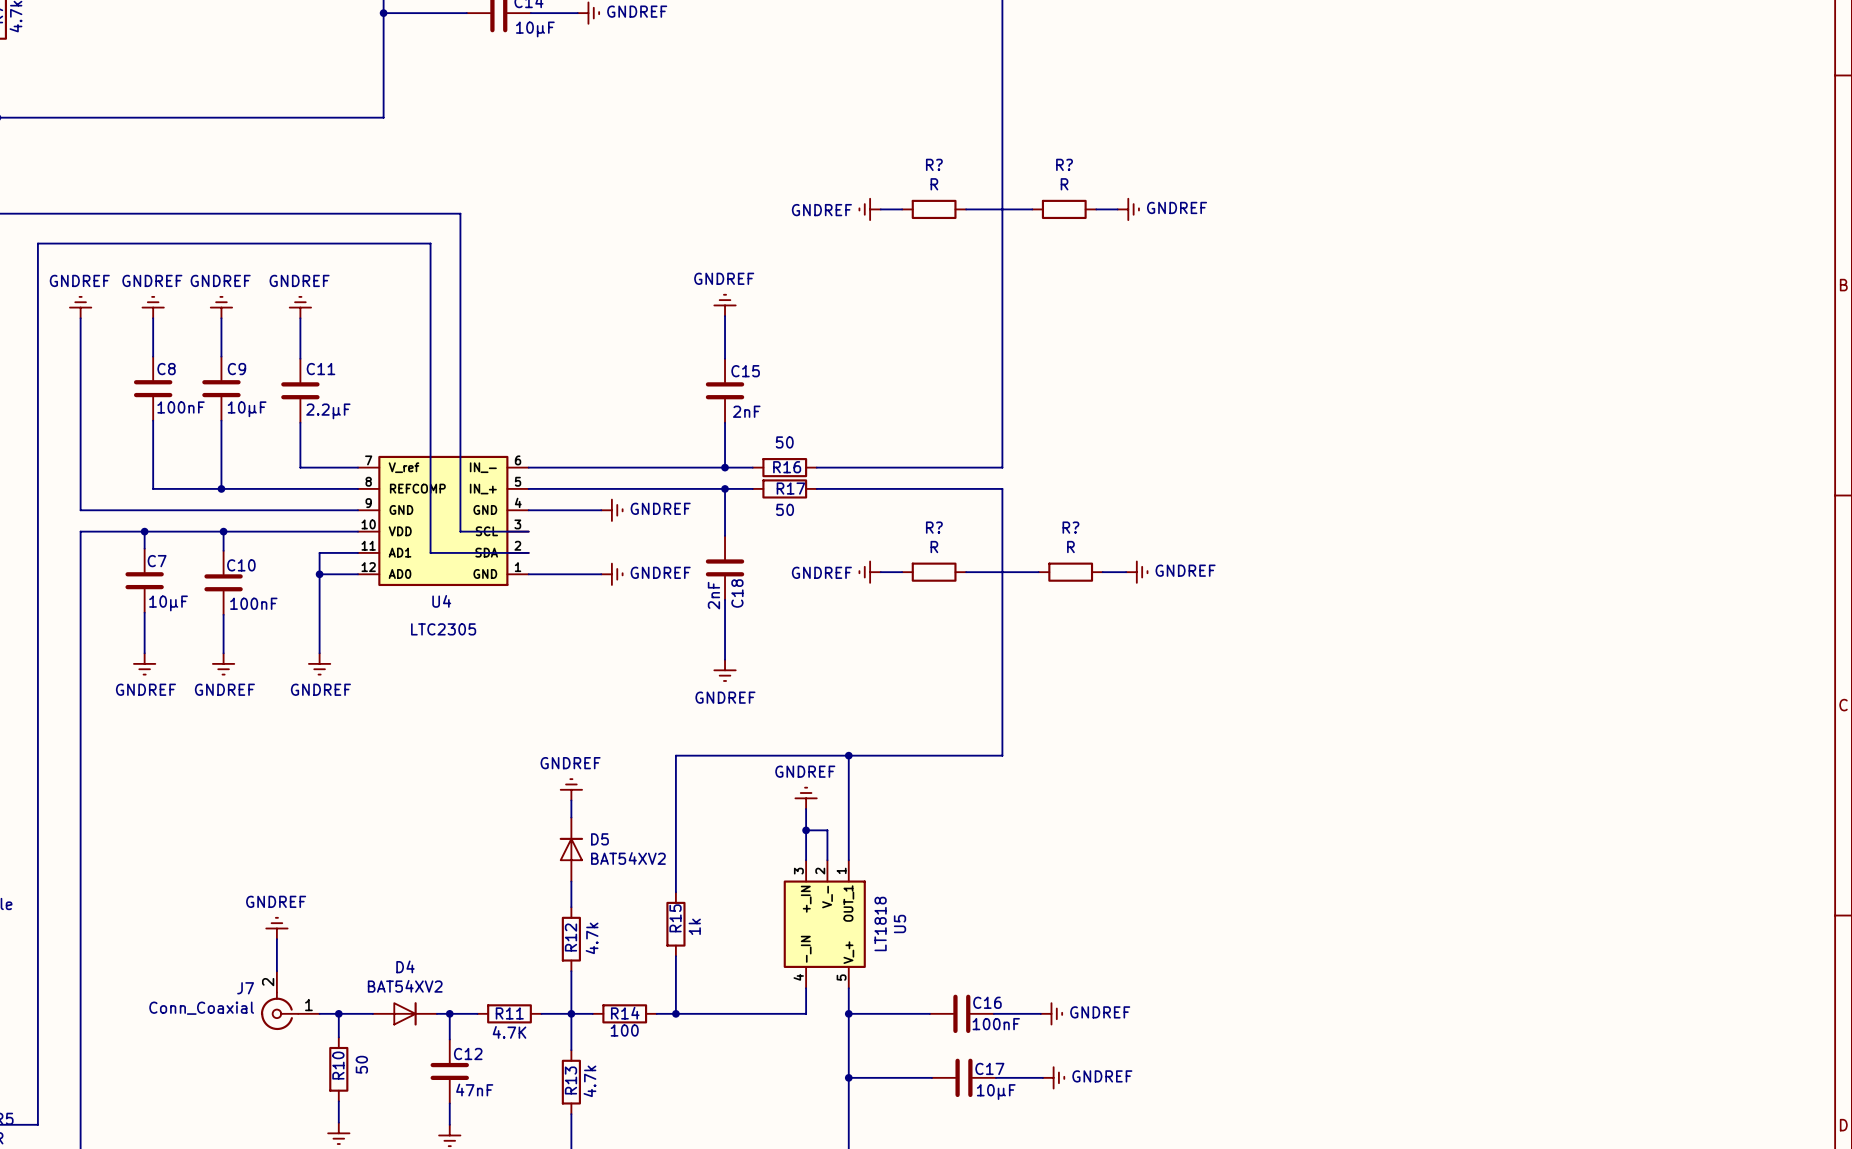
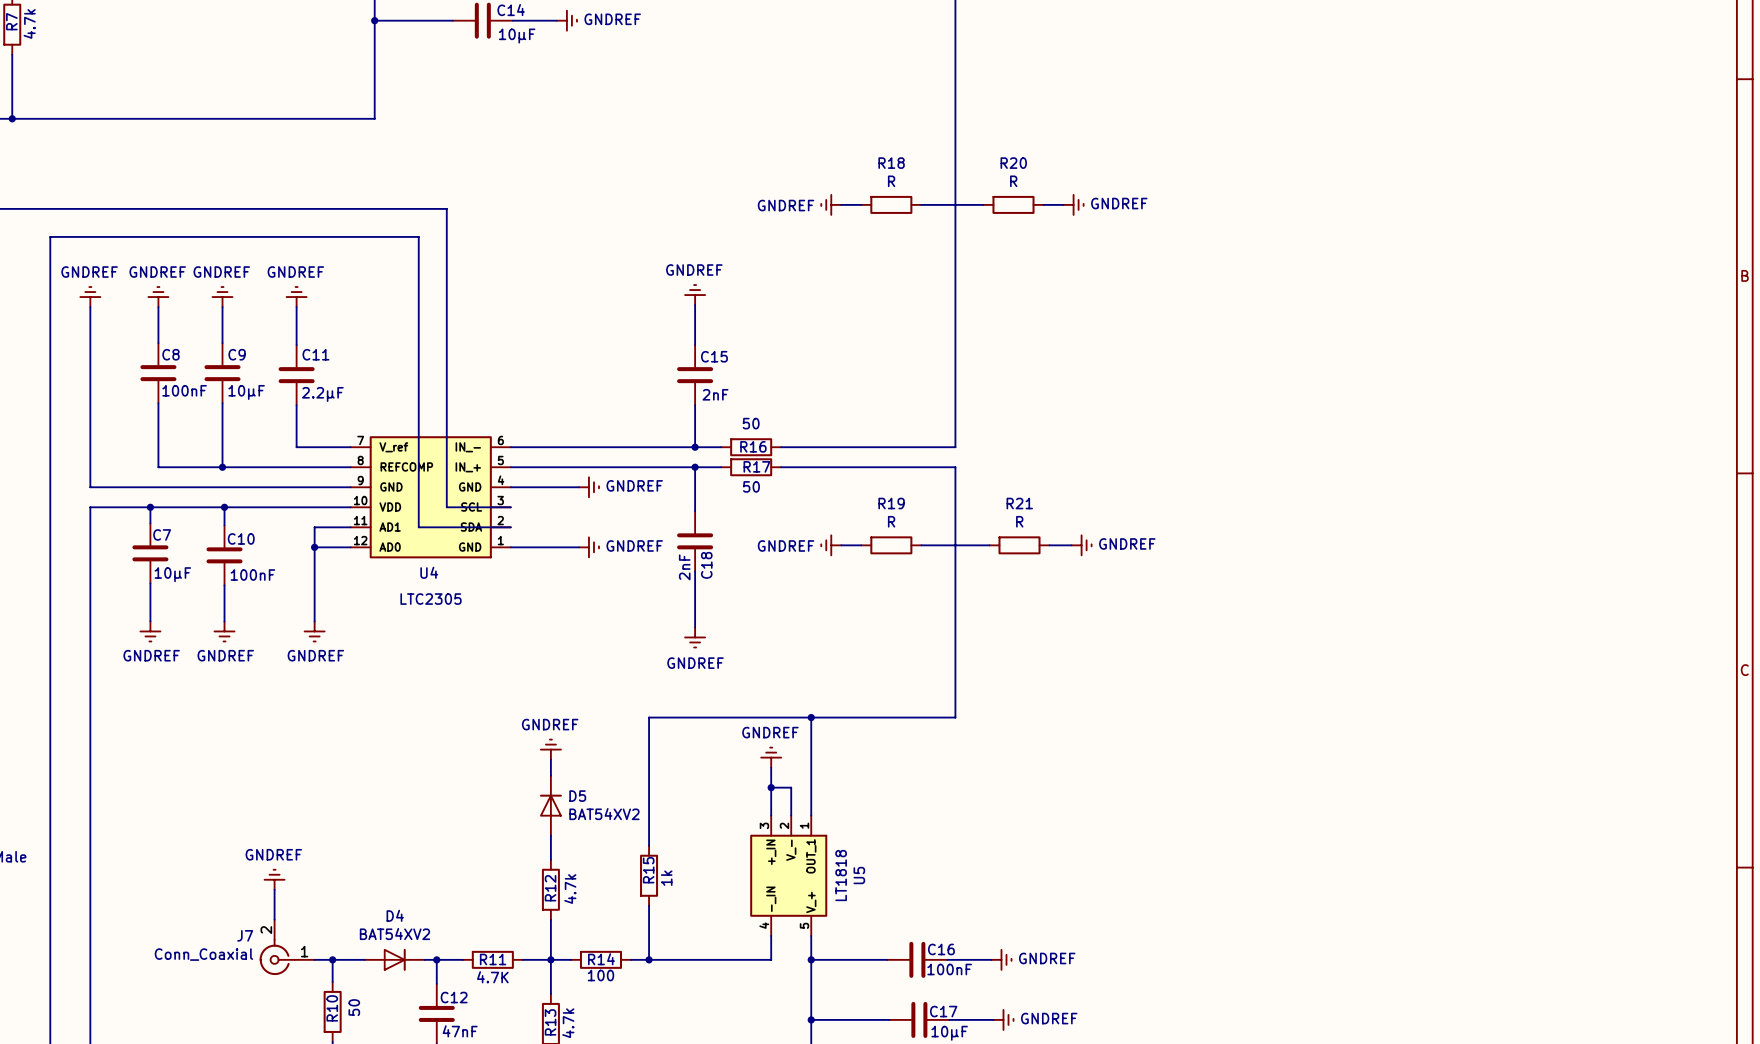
R? name: R? (934, 164) -> R18 (891, 163)
R? name: R? (1064, 164) -> R20 (1013, 163)
R? name: R? (934, 527) -> R19 (891, 503)
R? name: R? (1070, 527) -> R21 (1019, 503)

